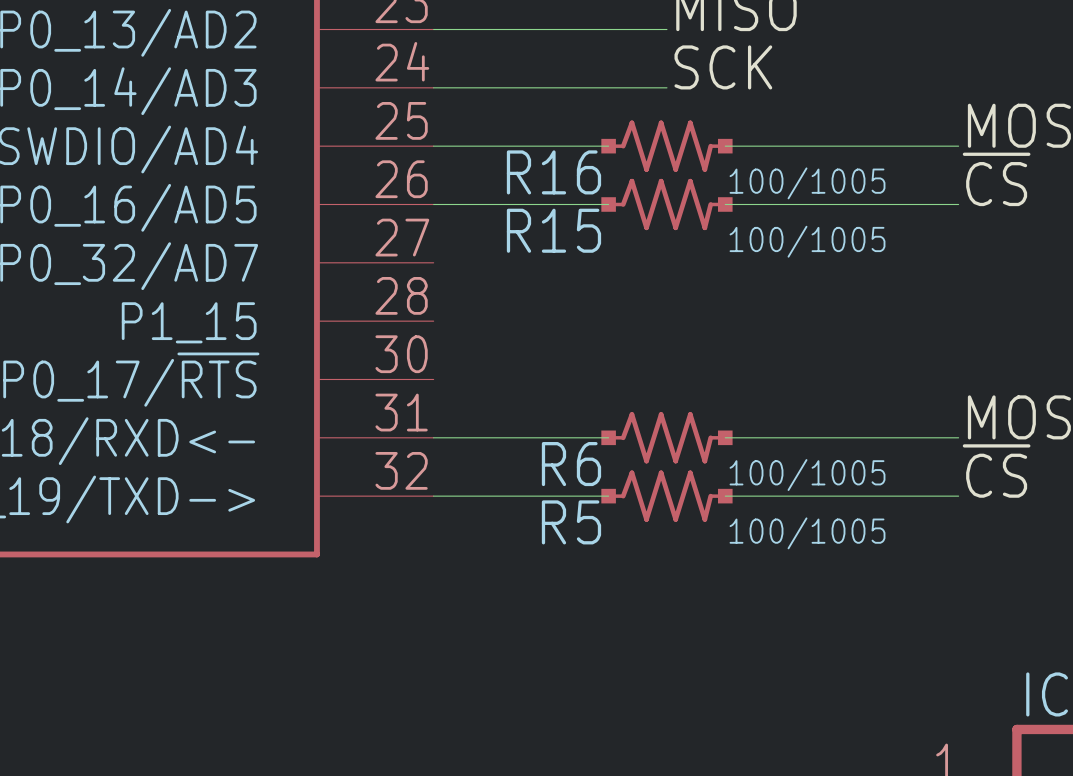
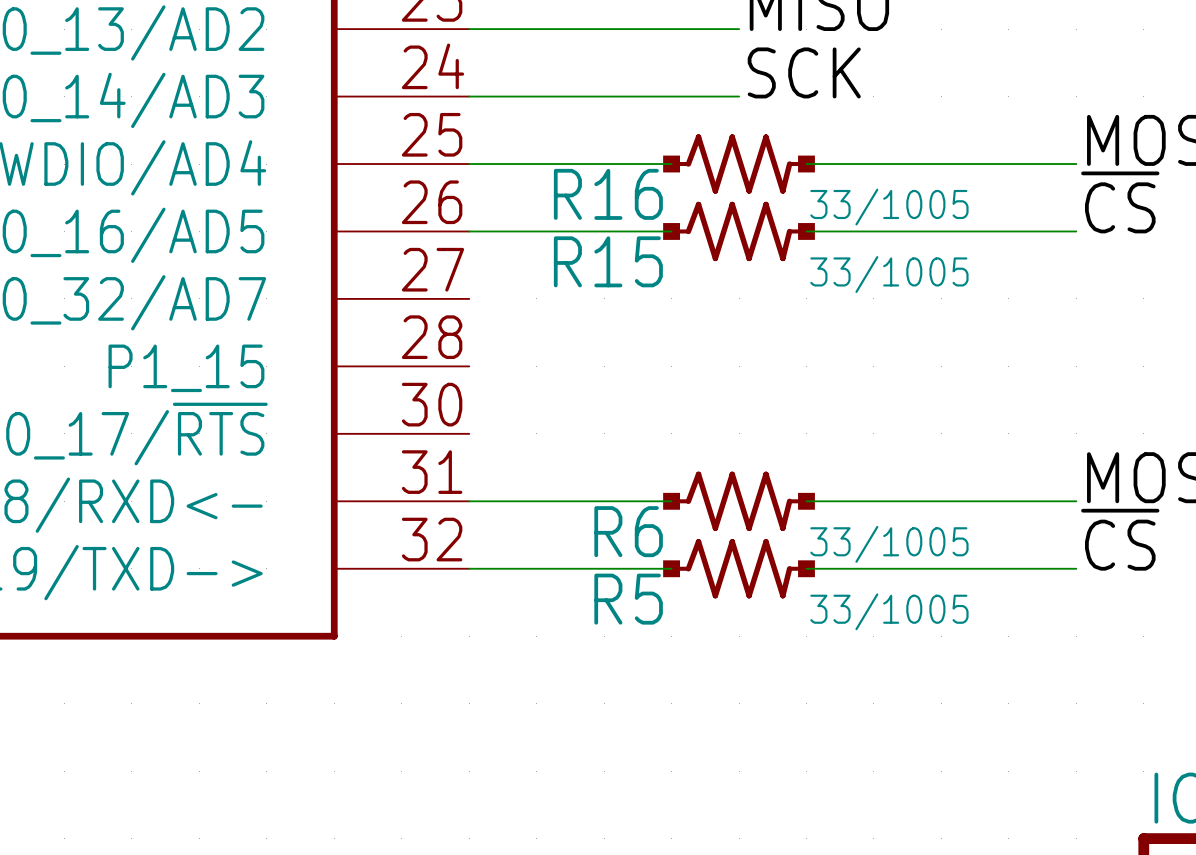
R16 value: 100/1005 (807, 183) -> 33/1005 (889, 207)
R15 value: 100/1005 (807, 241) -> 33/1005 (889, 274)
R6 value: 100/1005 (807, 475) -> 33/1005 (889, 544)
R5 value: 100/1005 (807, 533) -> 33/1005 (889, 611)

